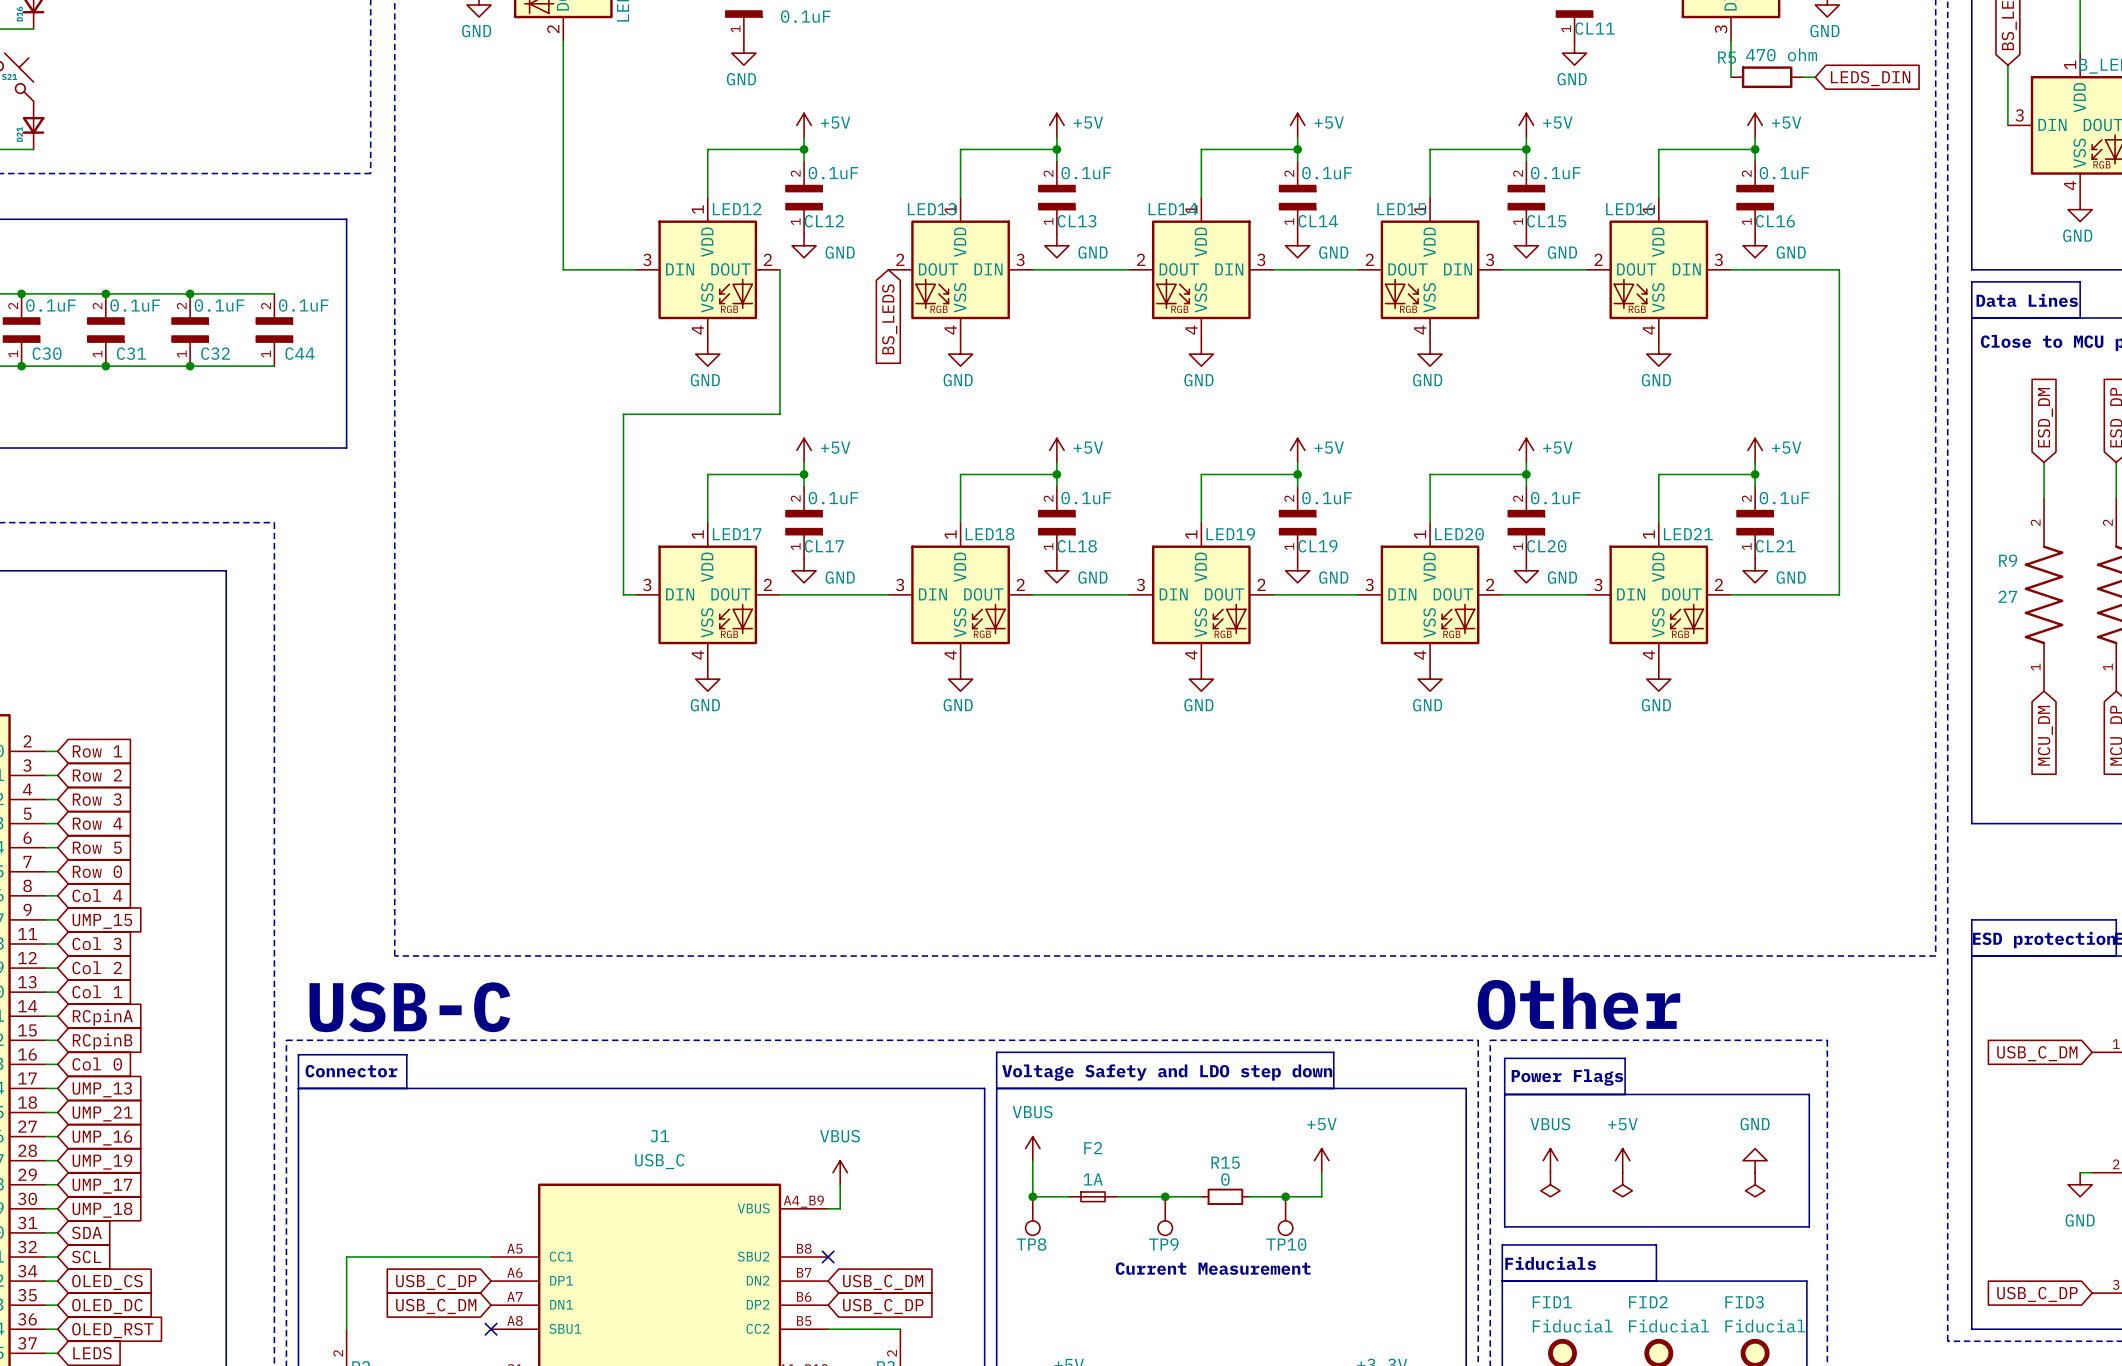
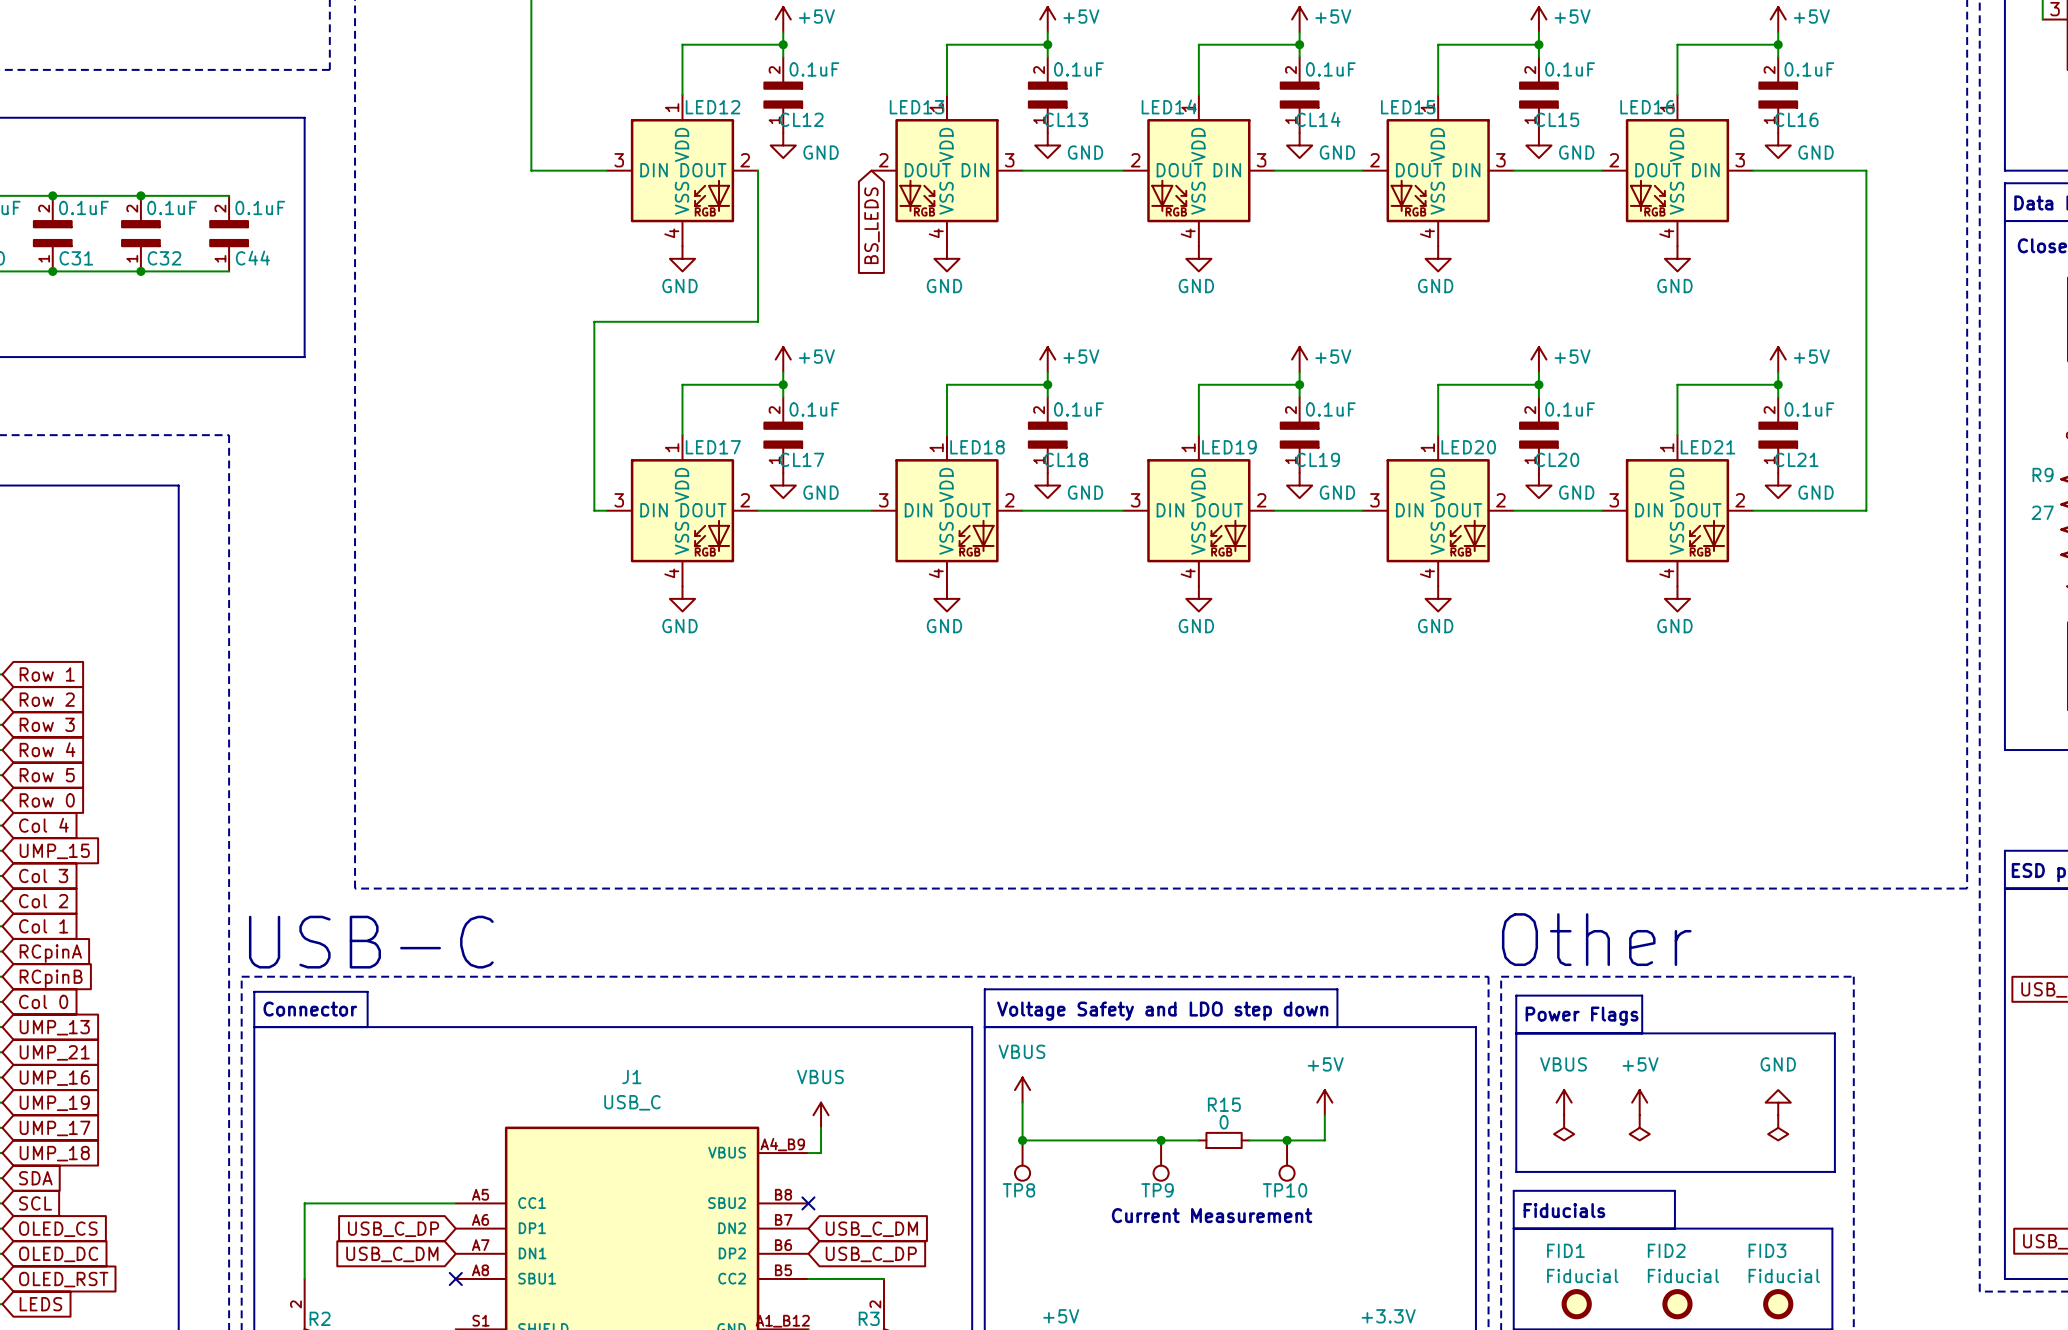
F2: 1A (1093, 1196) -> none

